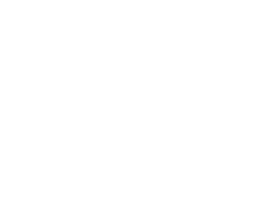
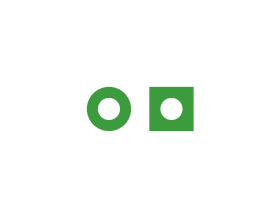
part: none -> (140, 108)

